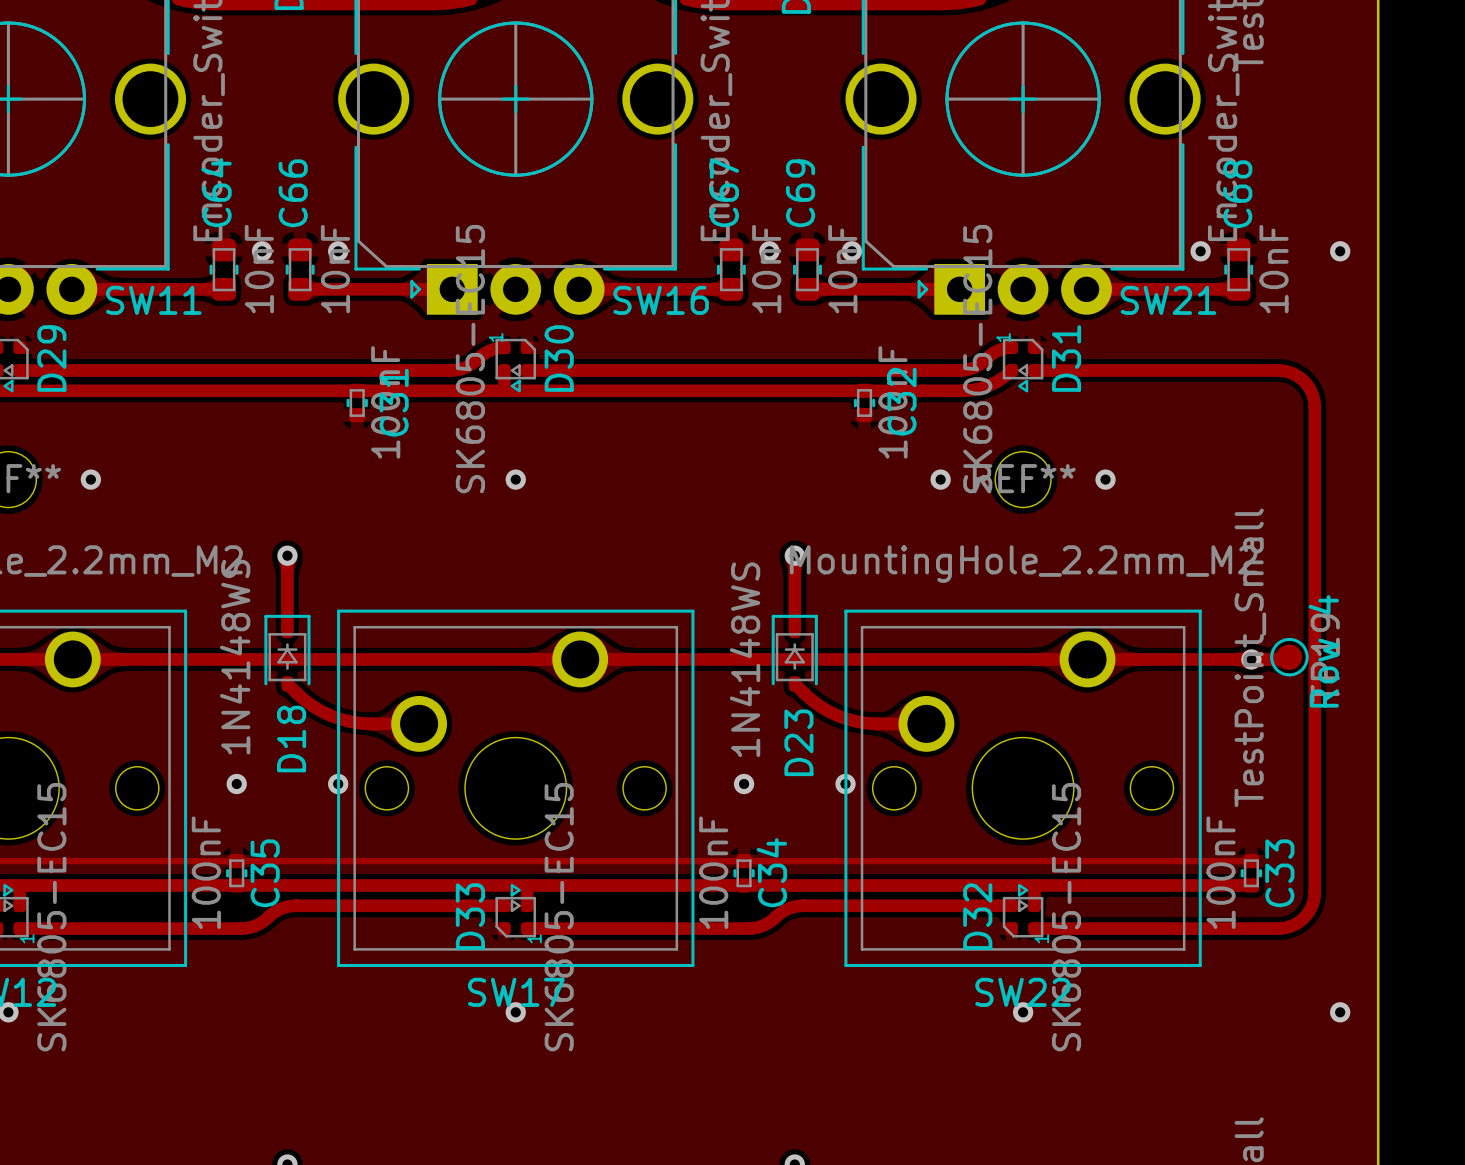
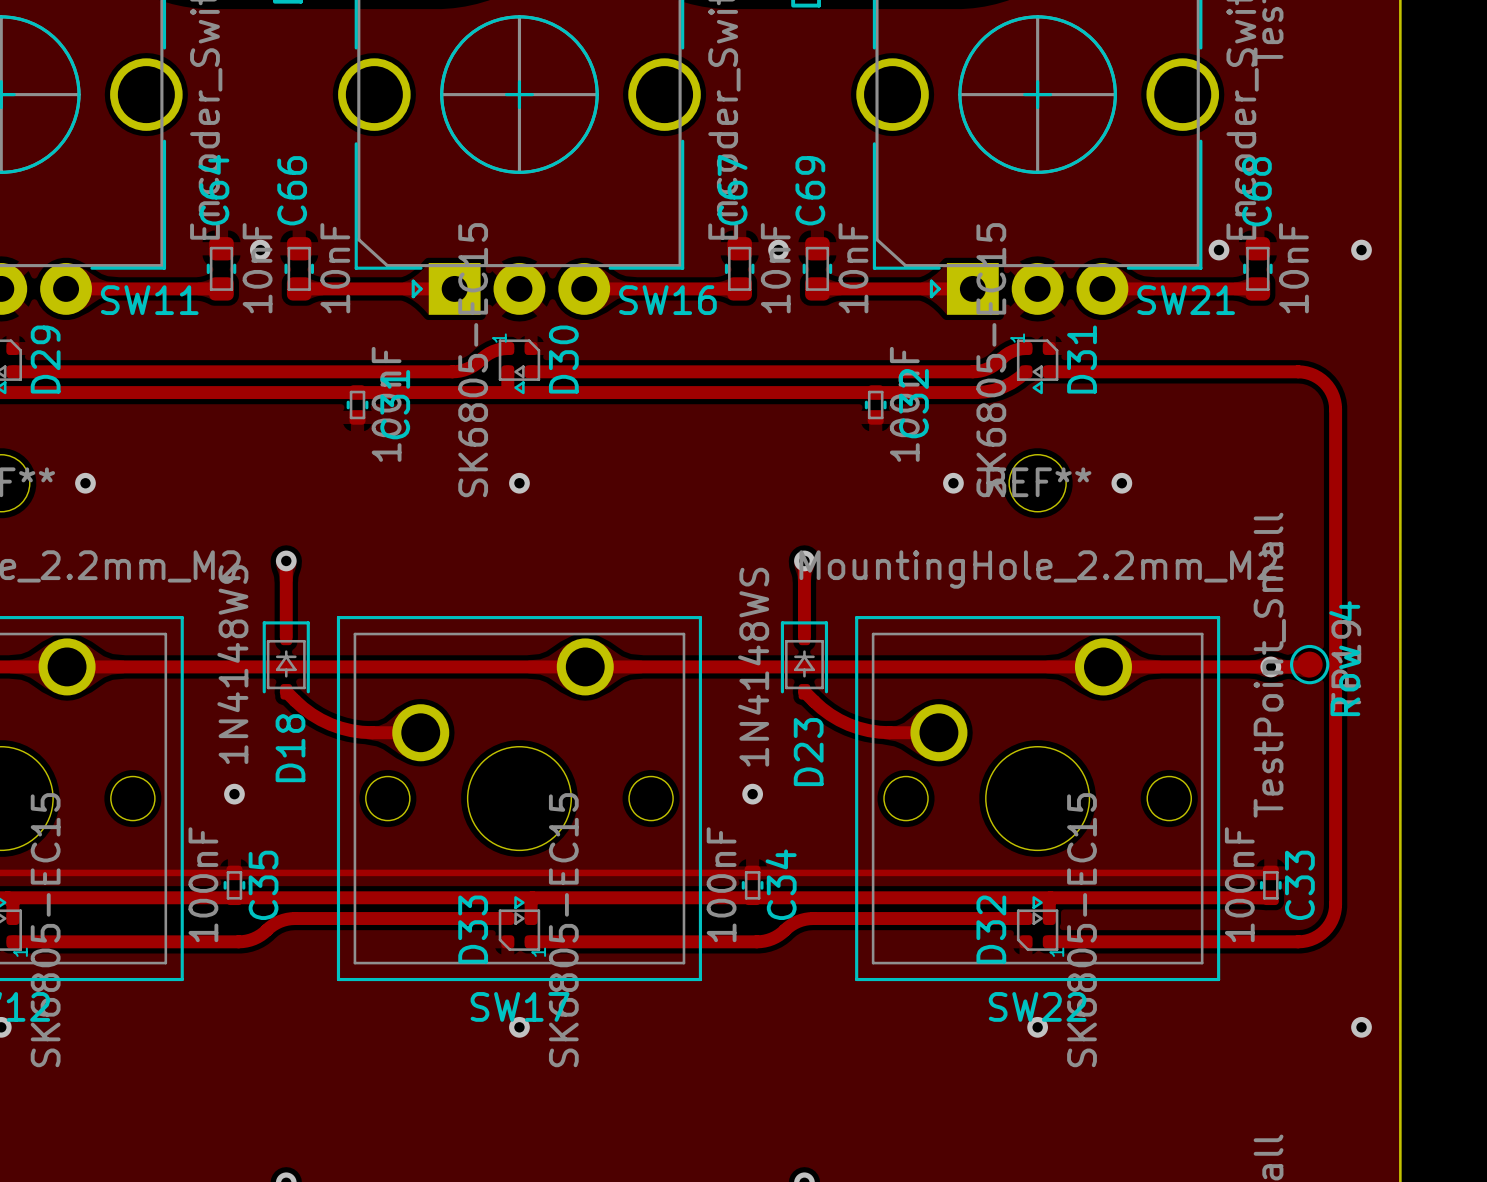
via: (338, 251) -> none
via: (851, 251) -> none
via: (338, 784) -> none
via: (845, 784) -> none

